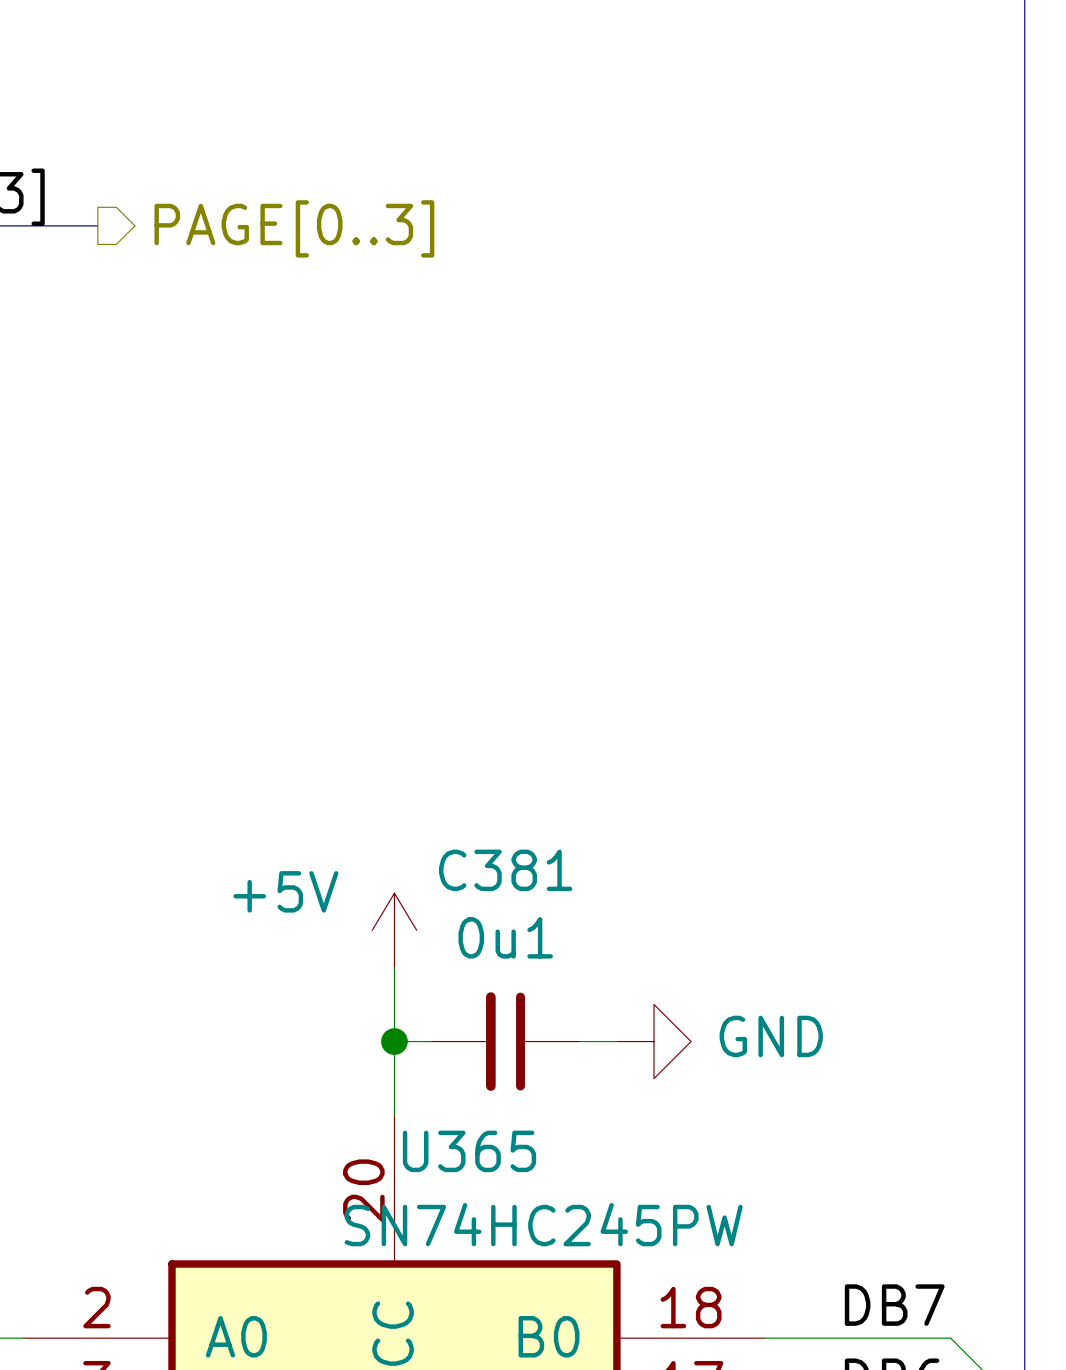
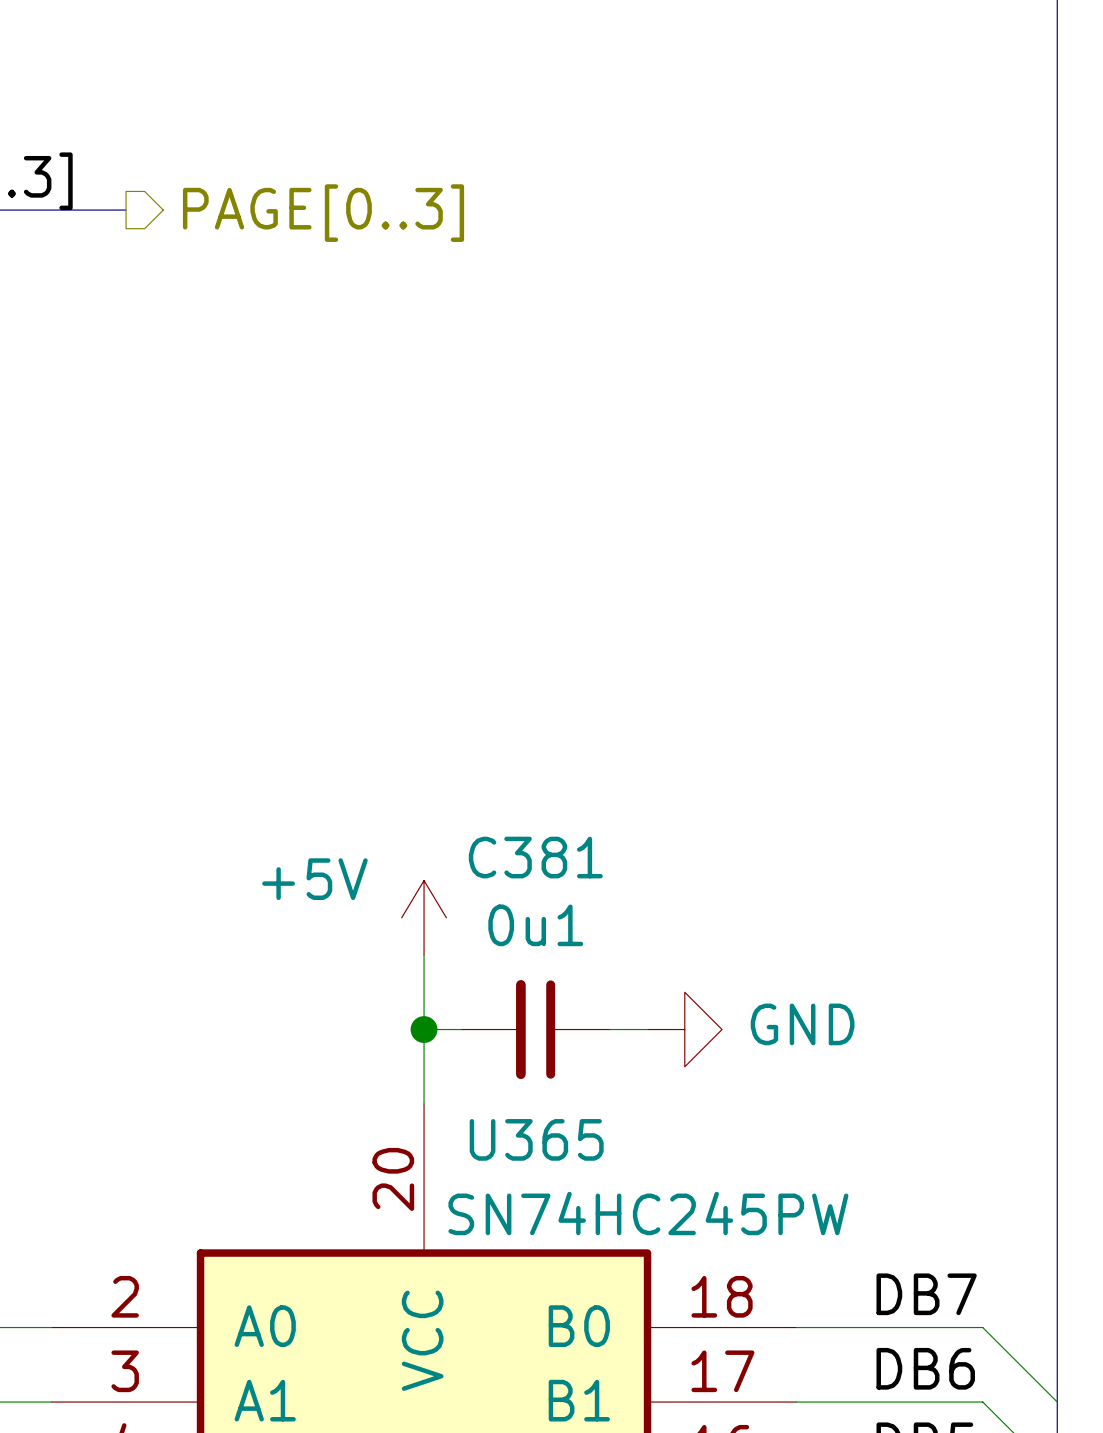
U365 name position: U365 (469, 1151) -> U365 (536, 1139)
U365 value position: SN74HC245PW (543, 1224) -> SN74HC245PW (648, 1213)

